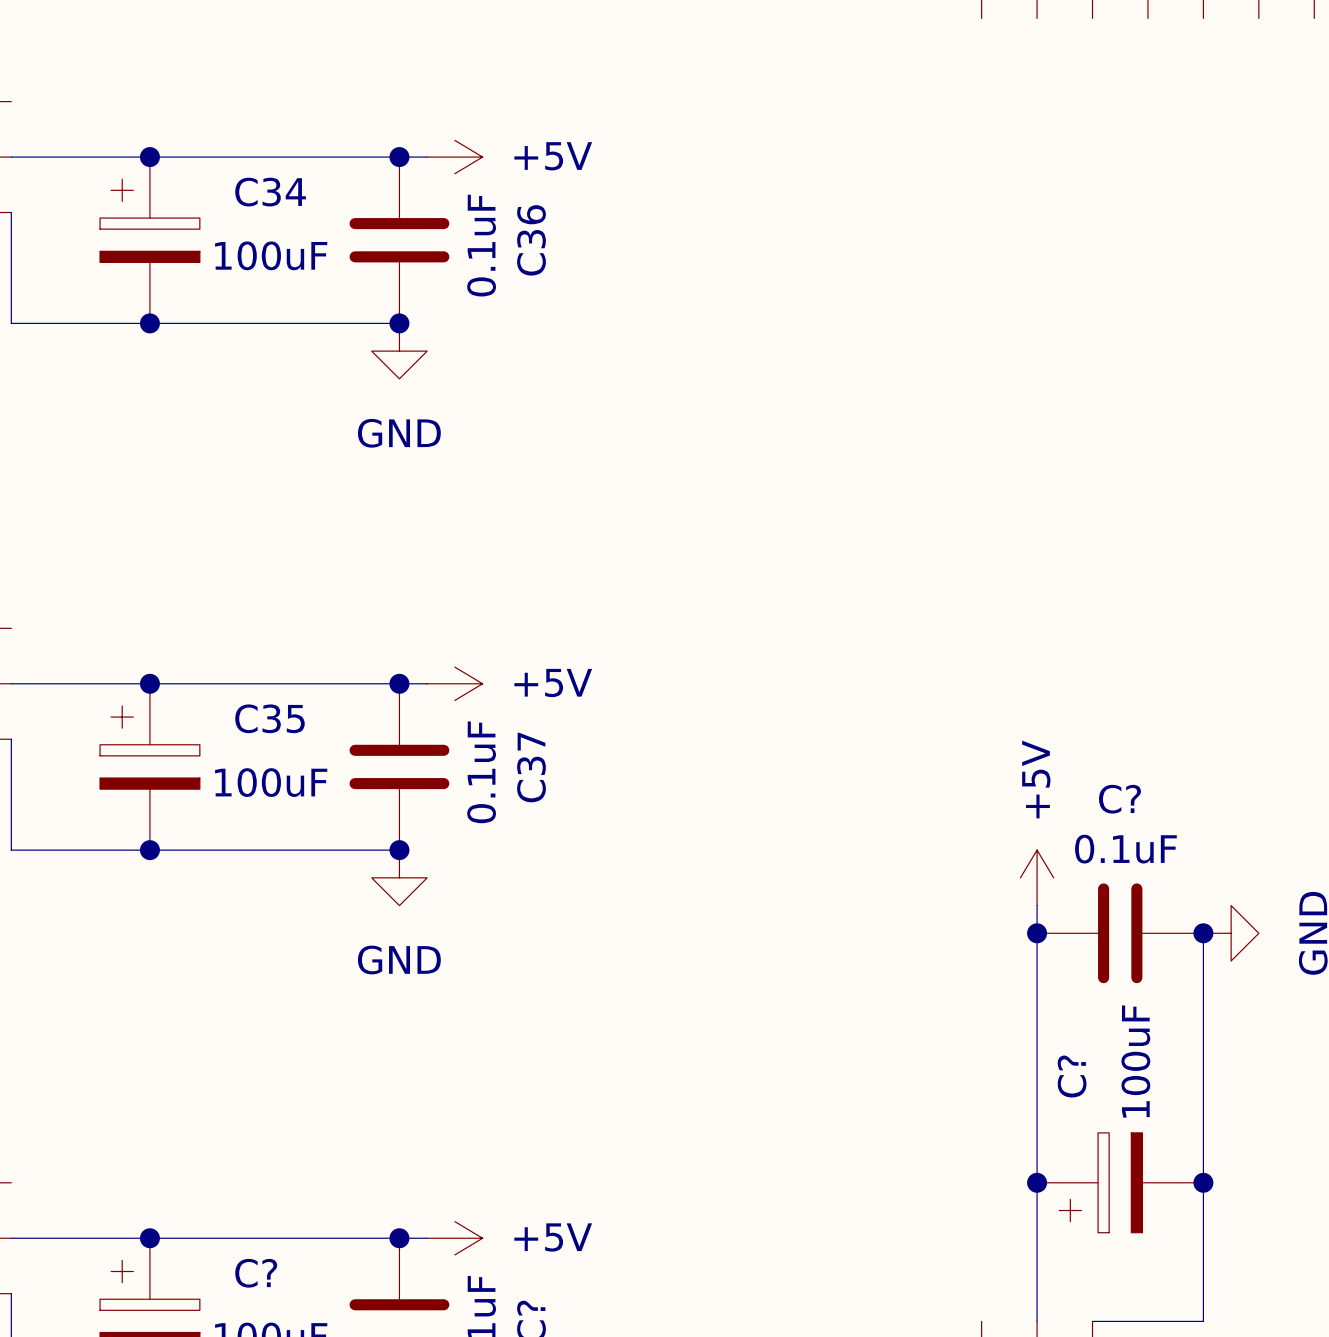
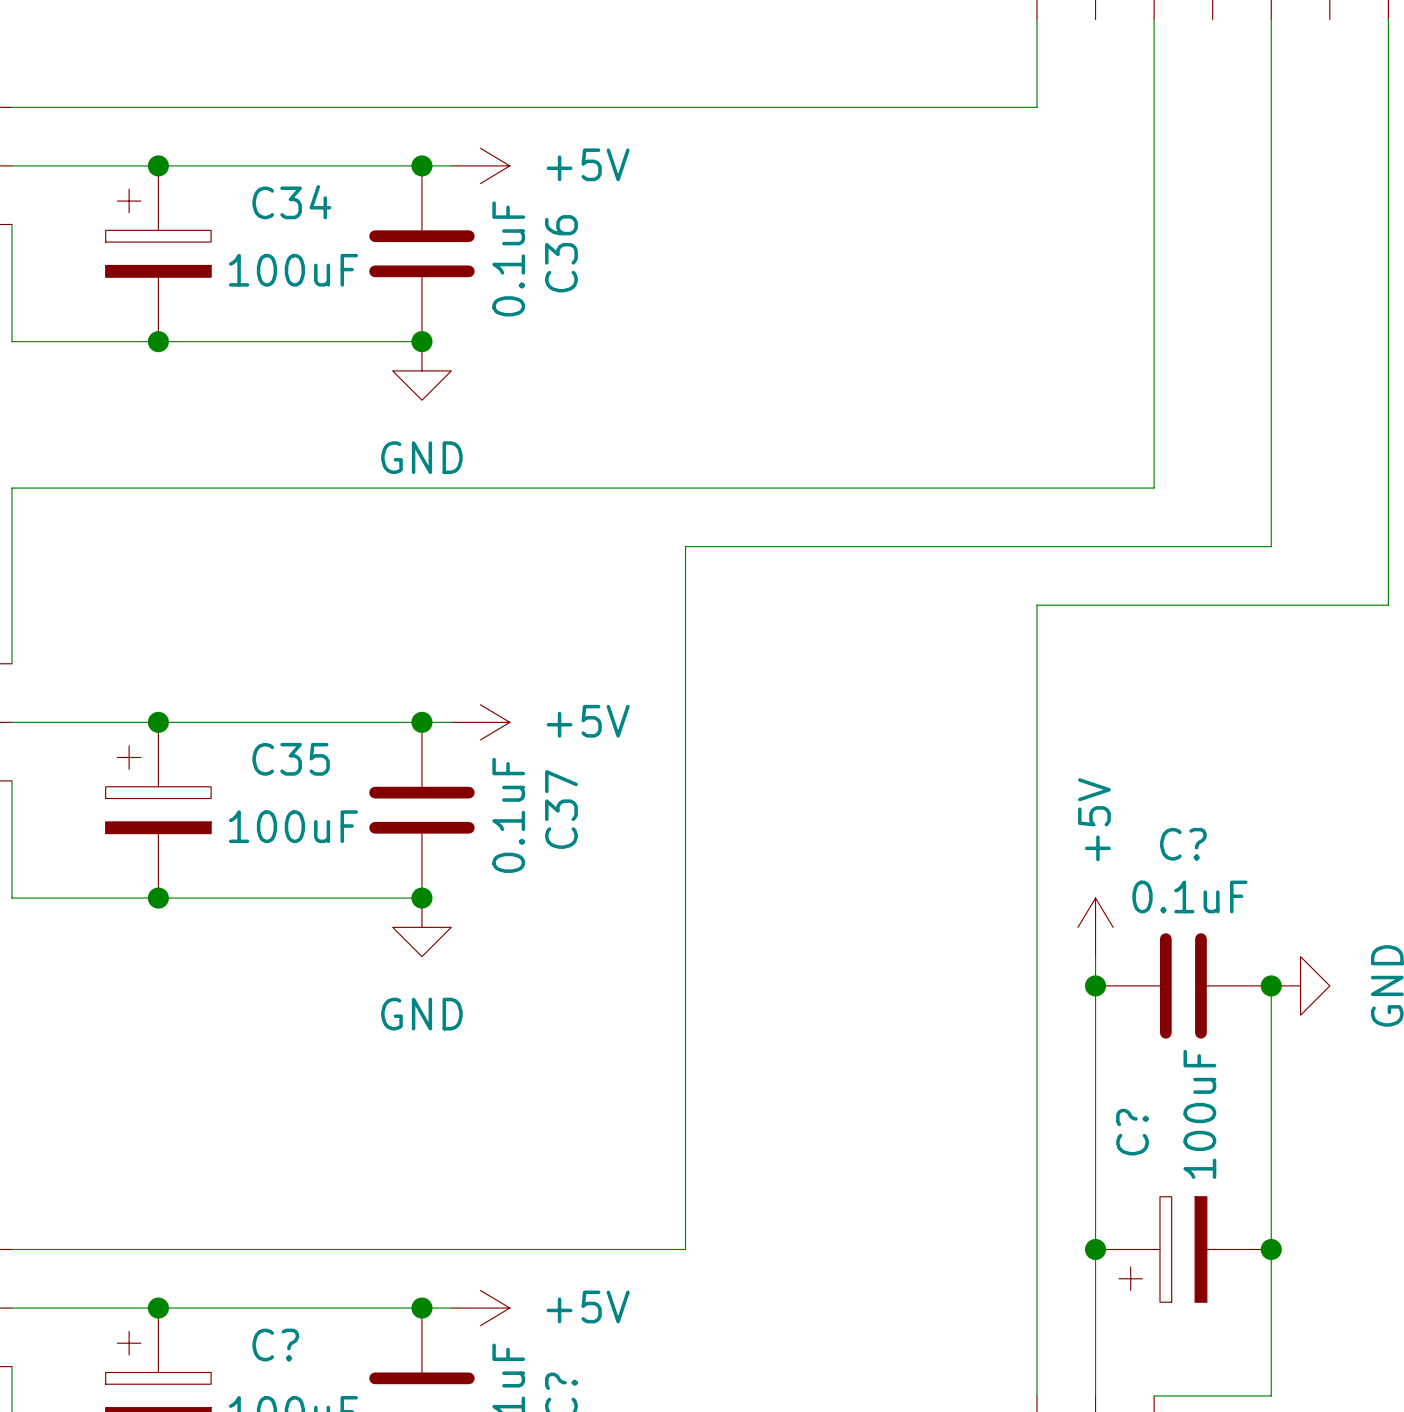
wire: none -> (1036, 19) (1036, 107) (11, 107)
wire: none -> (1154, 19) (1154, 488) (11, 488) (11, 663)
wire: none -> (1271, 19) (1271, 546) (685, 546) (685, 1249) (11, 1249)
wire: none -> (1388, 19) (1388, 605) (1036, 605) (1036, 1395)

